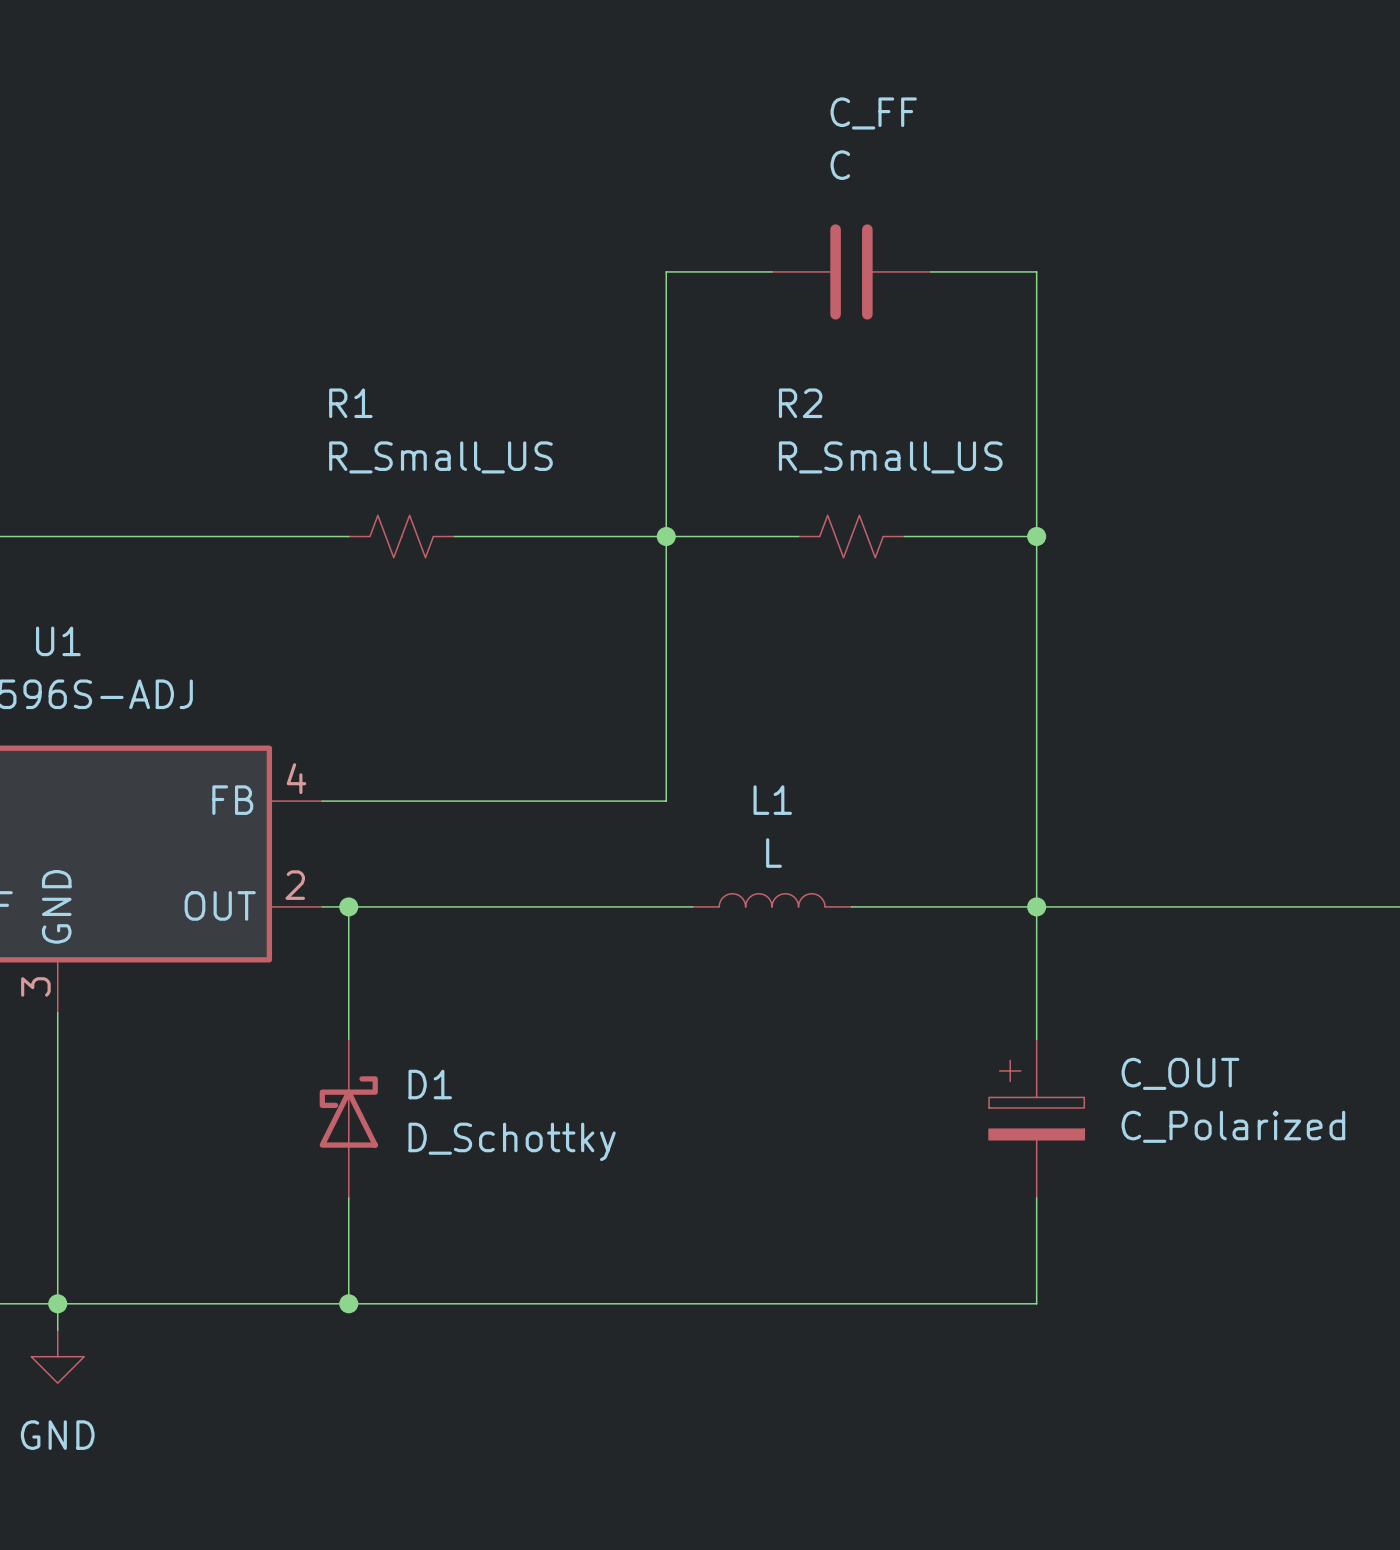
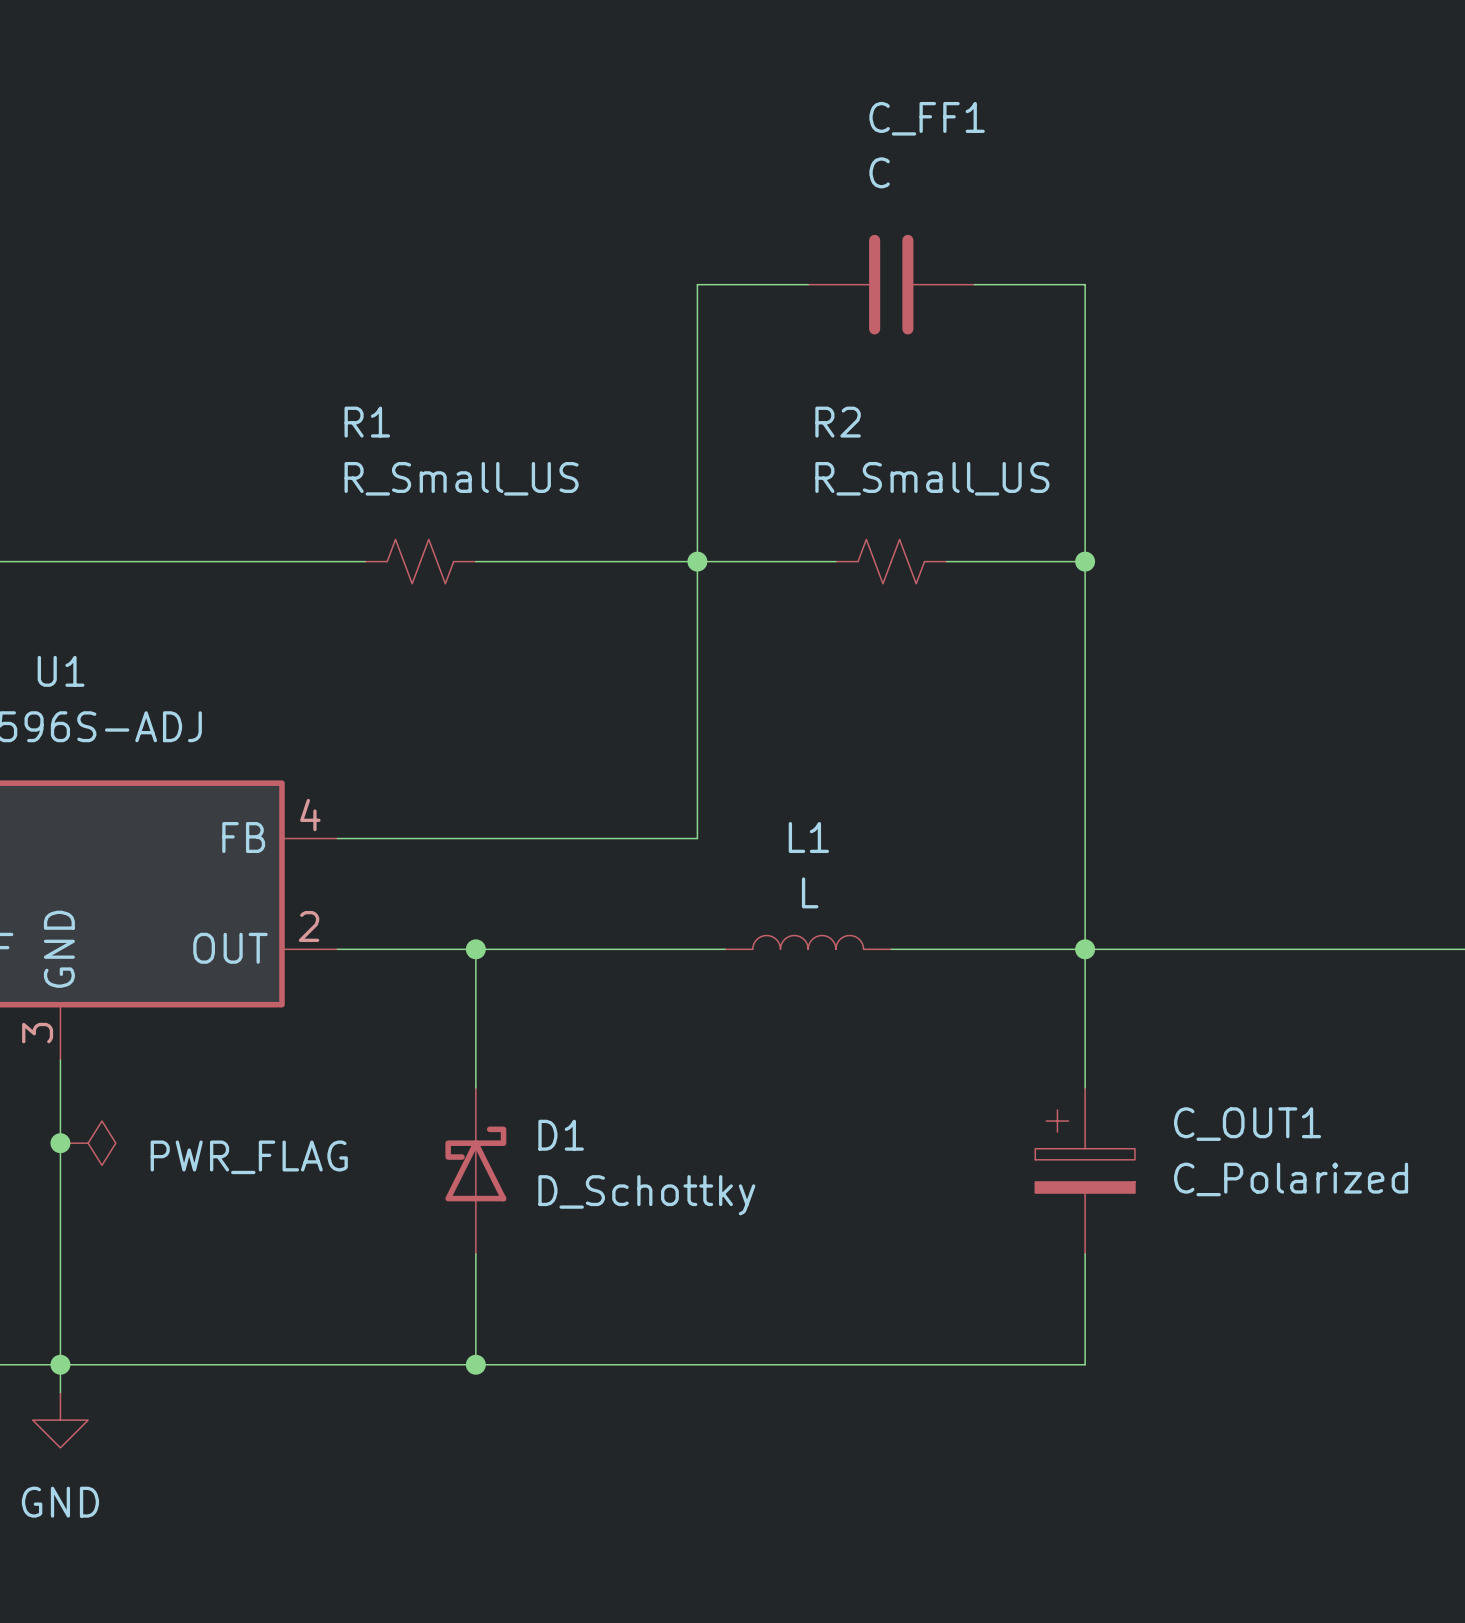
C_FF name: C_FF (873, 113) -> C_FF1 (927, 118)
wire: (348, 906) (348, 1039) -> (475, 949) (475, 1087)
junction position: (348, 906) -> (475, 949)
C_OUT name: C_OUT (1180, 1073) -> C_OUT1 (1247, 1124)
junction: none -> (60, 1143)
power symbol: none -> PWR_FLAG (88, 1143)
D1 position: (348, 1118) -> (475, 1170)
wire: (348, 1197) (348, 1303) -> (475, 1253) (475, 1364)
junction position: (348, 1303) -> (475, 1364)

